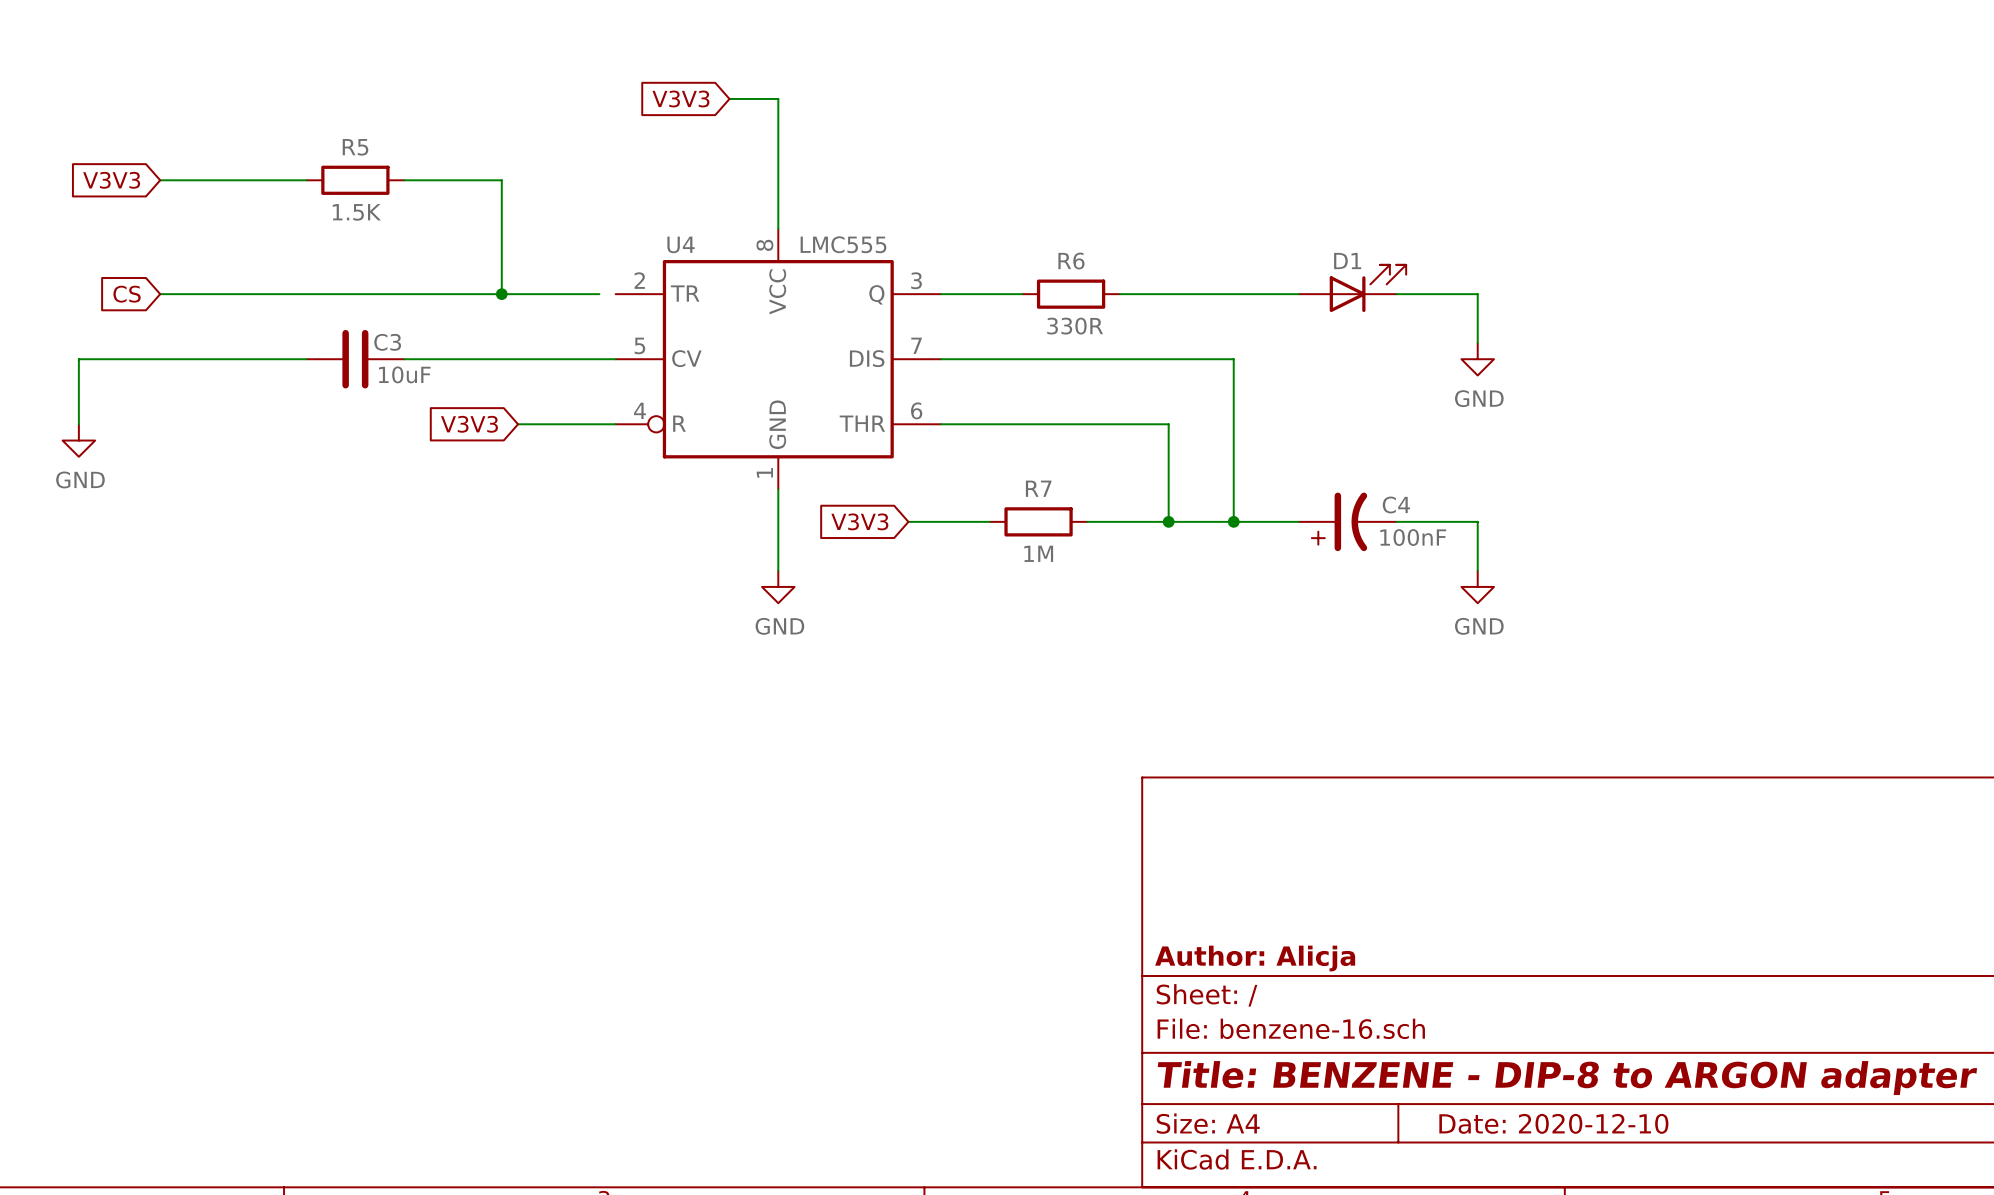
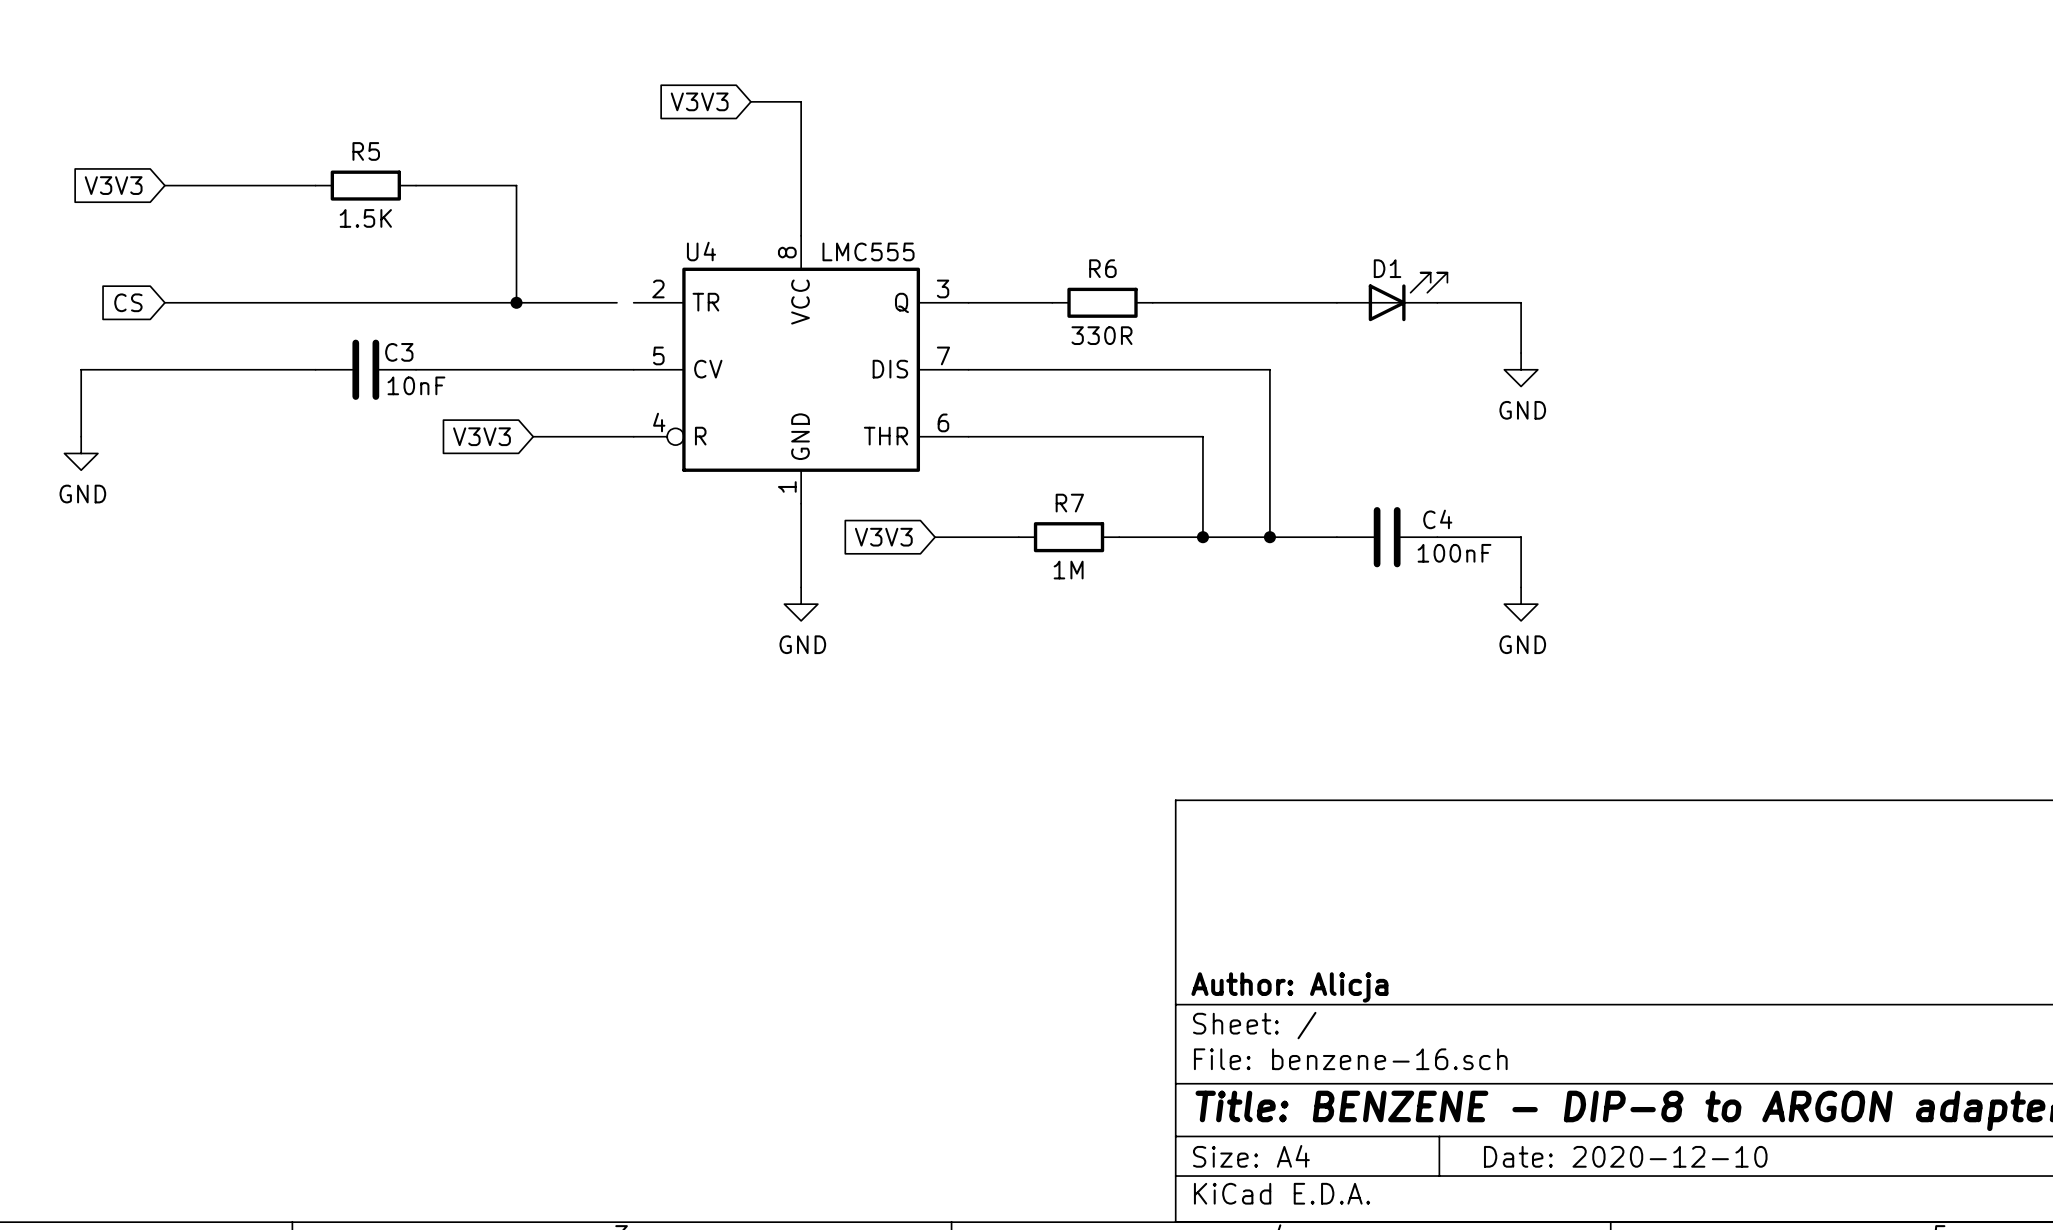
C3 value: 10uF (404, 374) -> 10nF (416, 385)
C4 symbol: [1298, 492, 1397, 552] -> [1336, 507, 1438, 568]

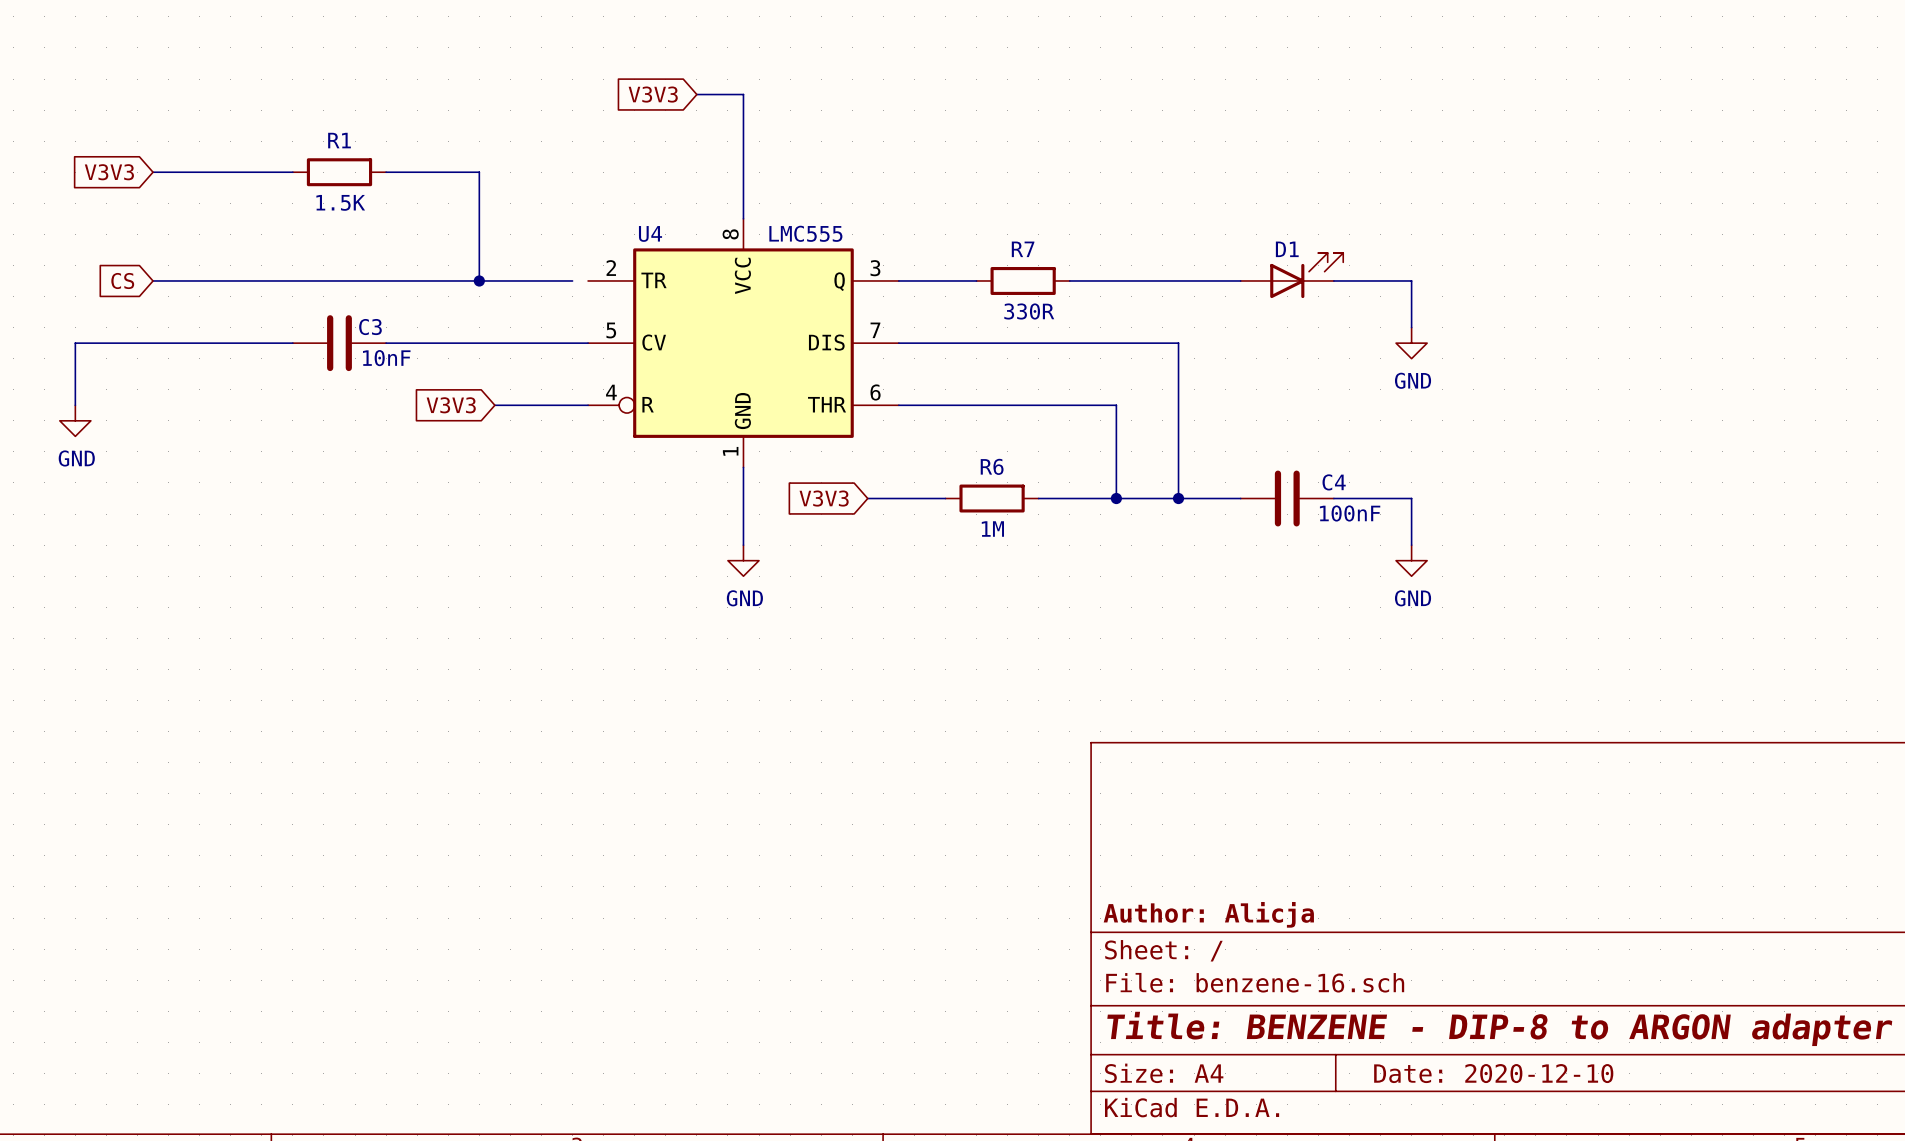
R5 name: R5 (366, 151) -> R1 (339, 140)
R6 name: R6 (1102, 268) -> R7 (1023, 249)
R7 name: R7 (1069, 503) -> R6 (992, 466)

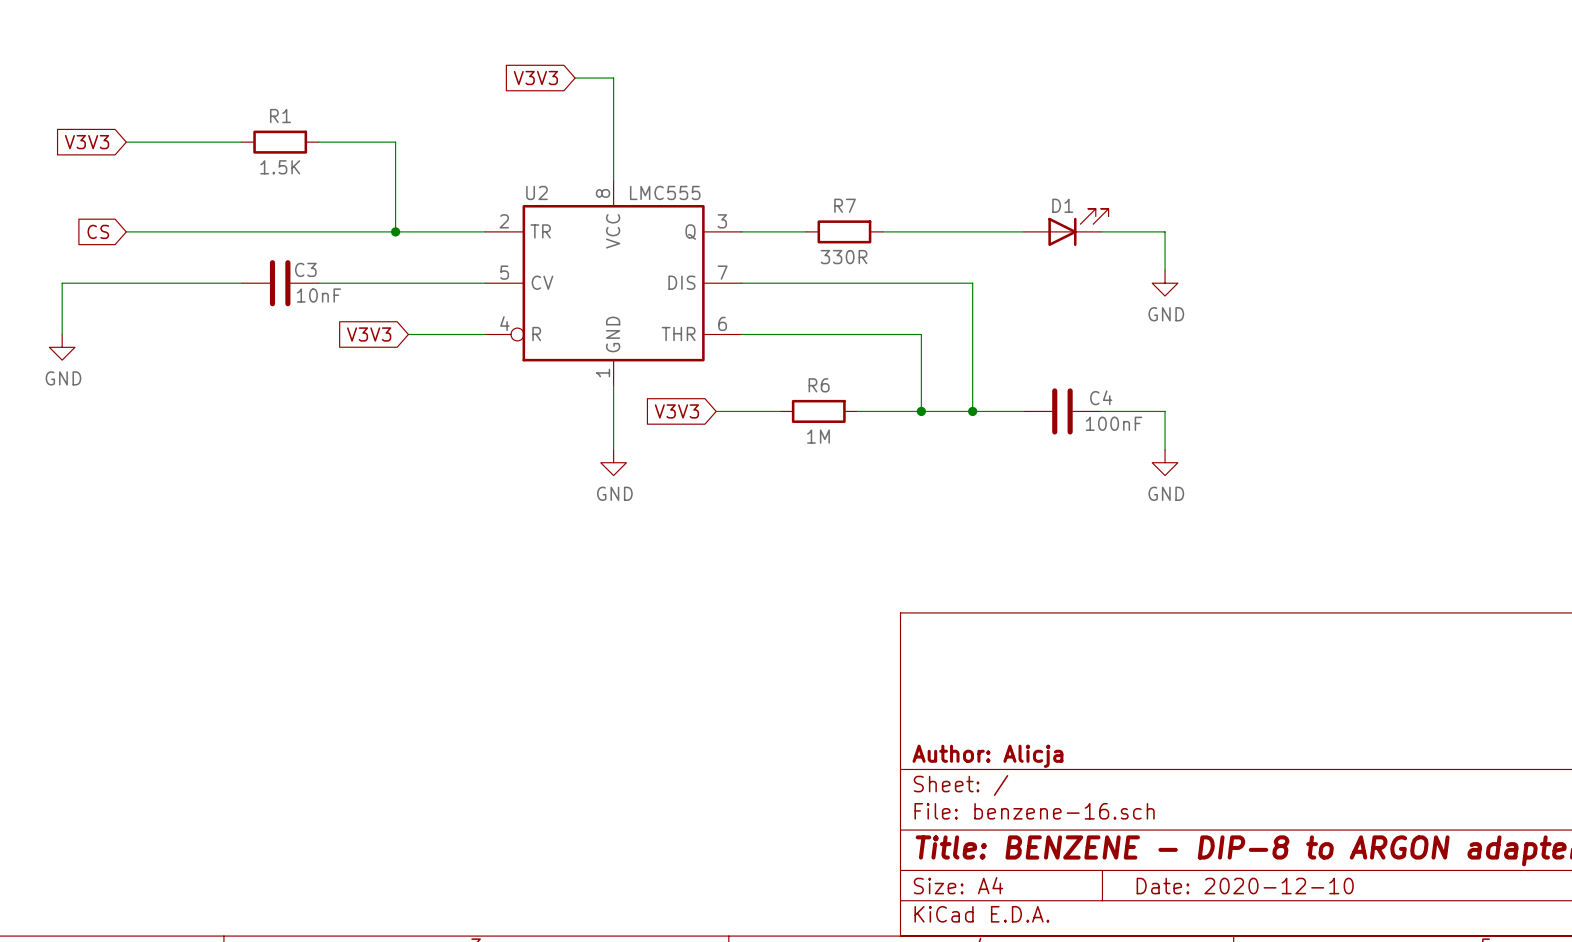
U4 name: U4 (650, 233) -> U2 (536, 192)
wire: none -> (472, 231) (485, 231)

